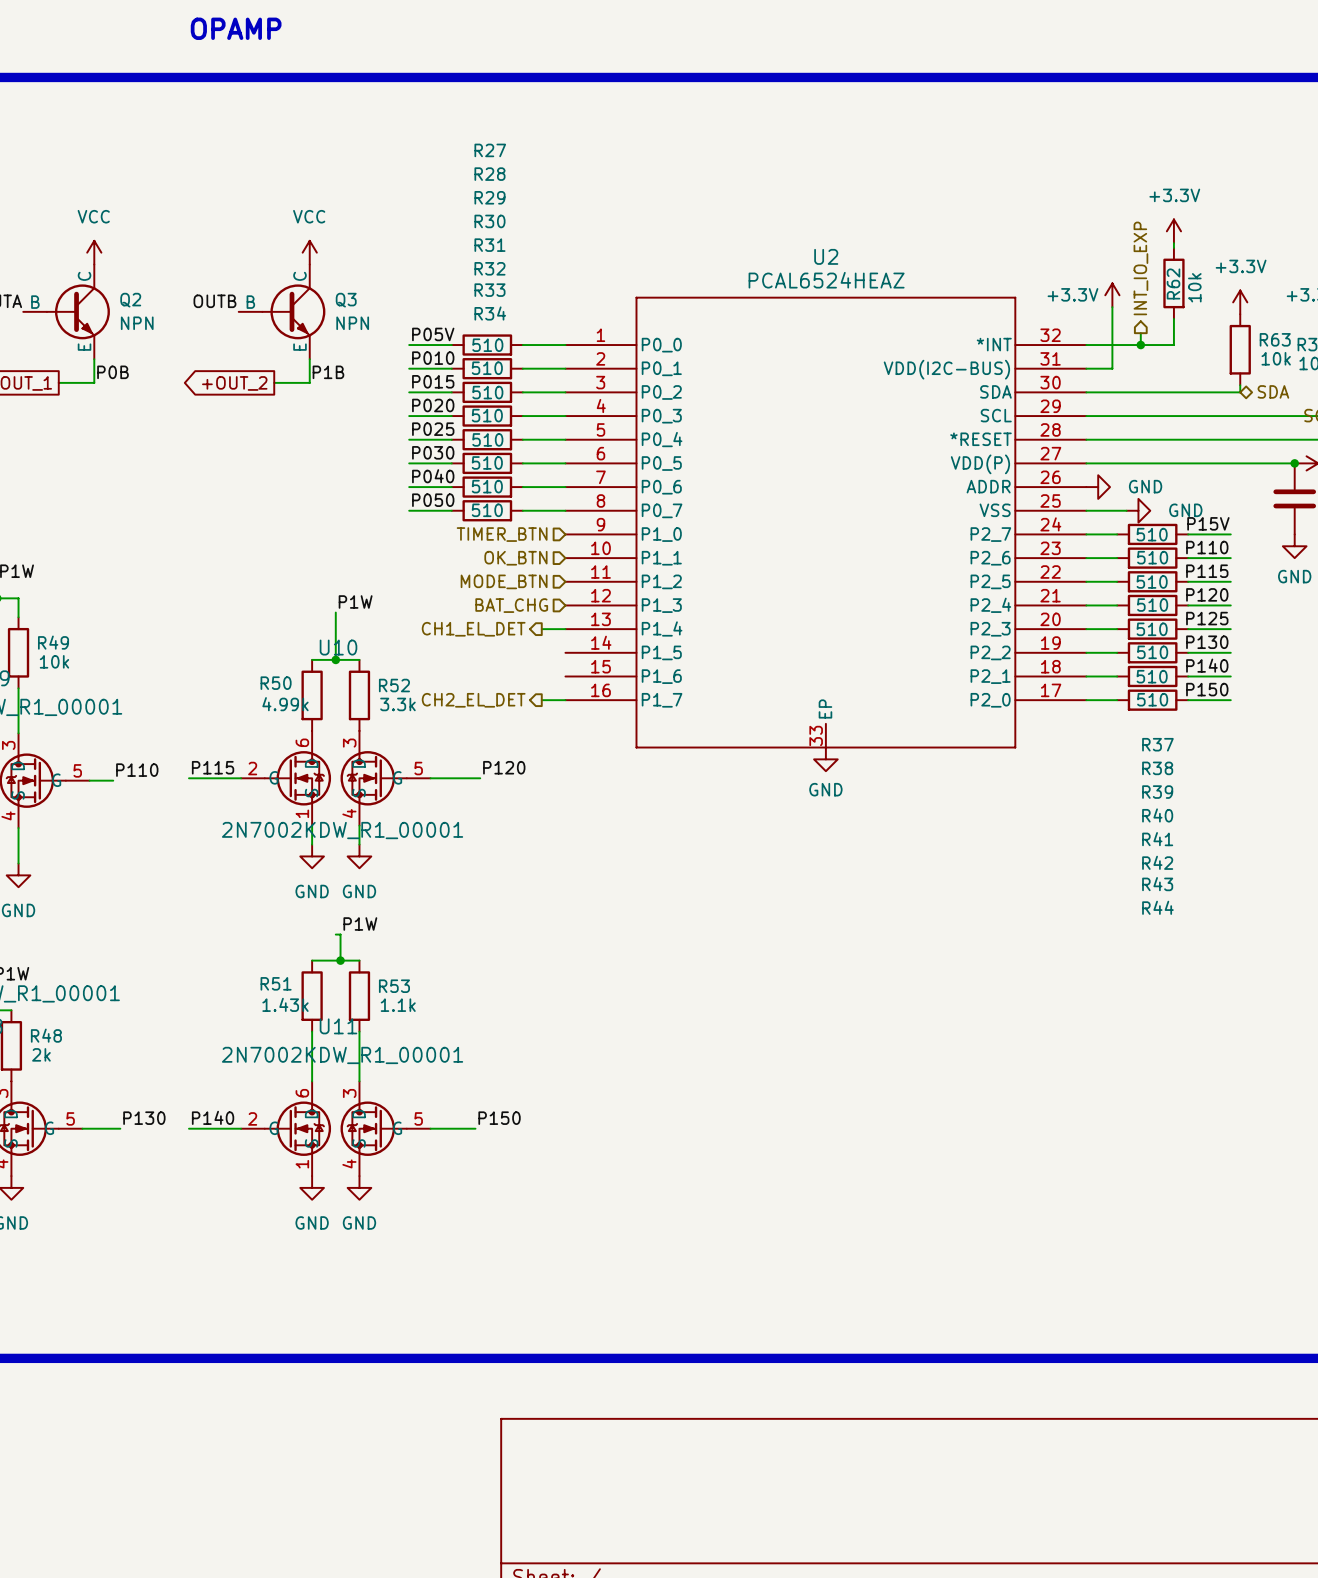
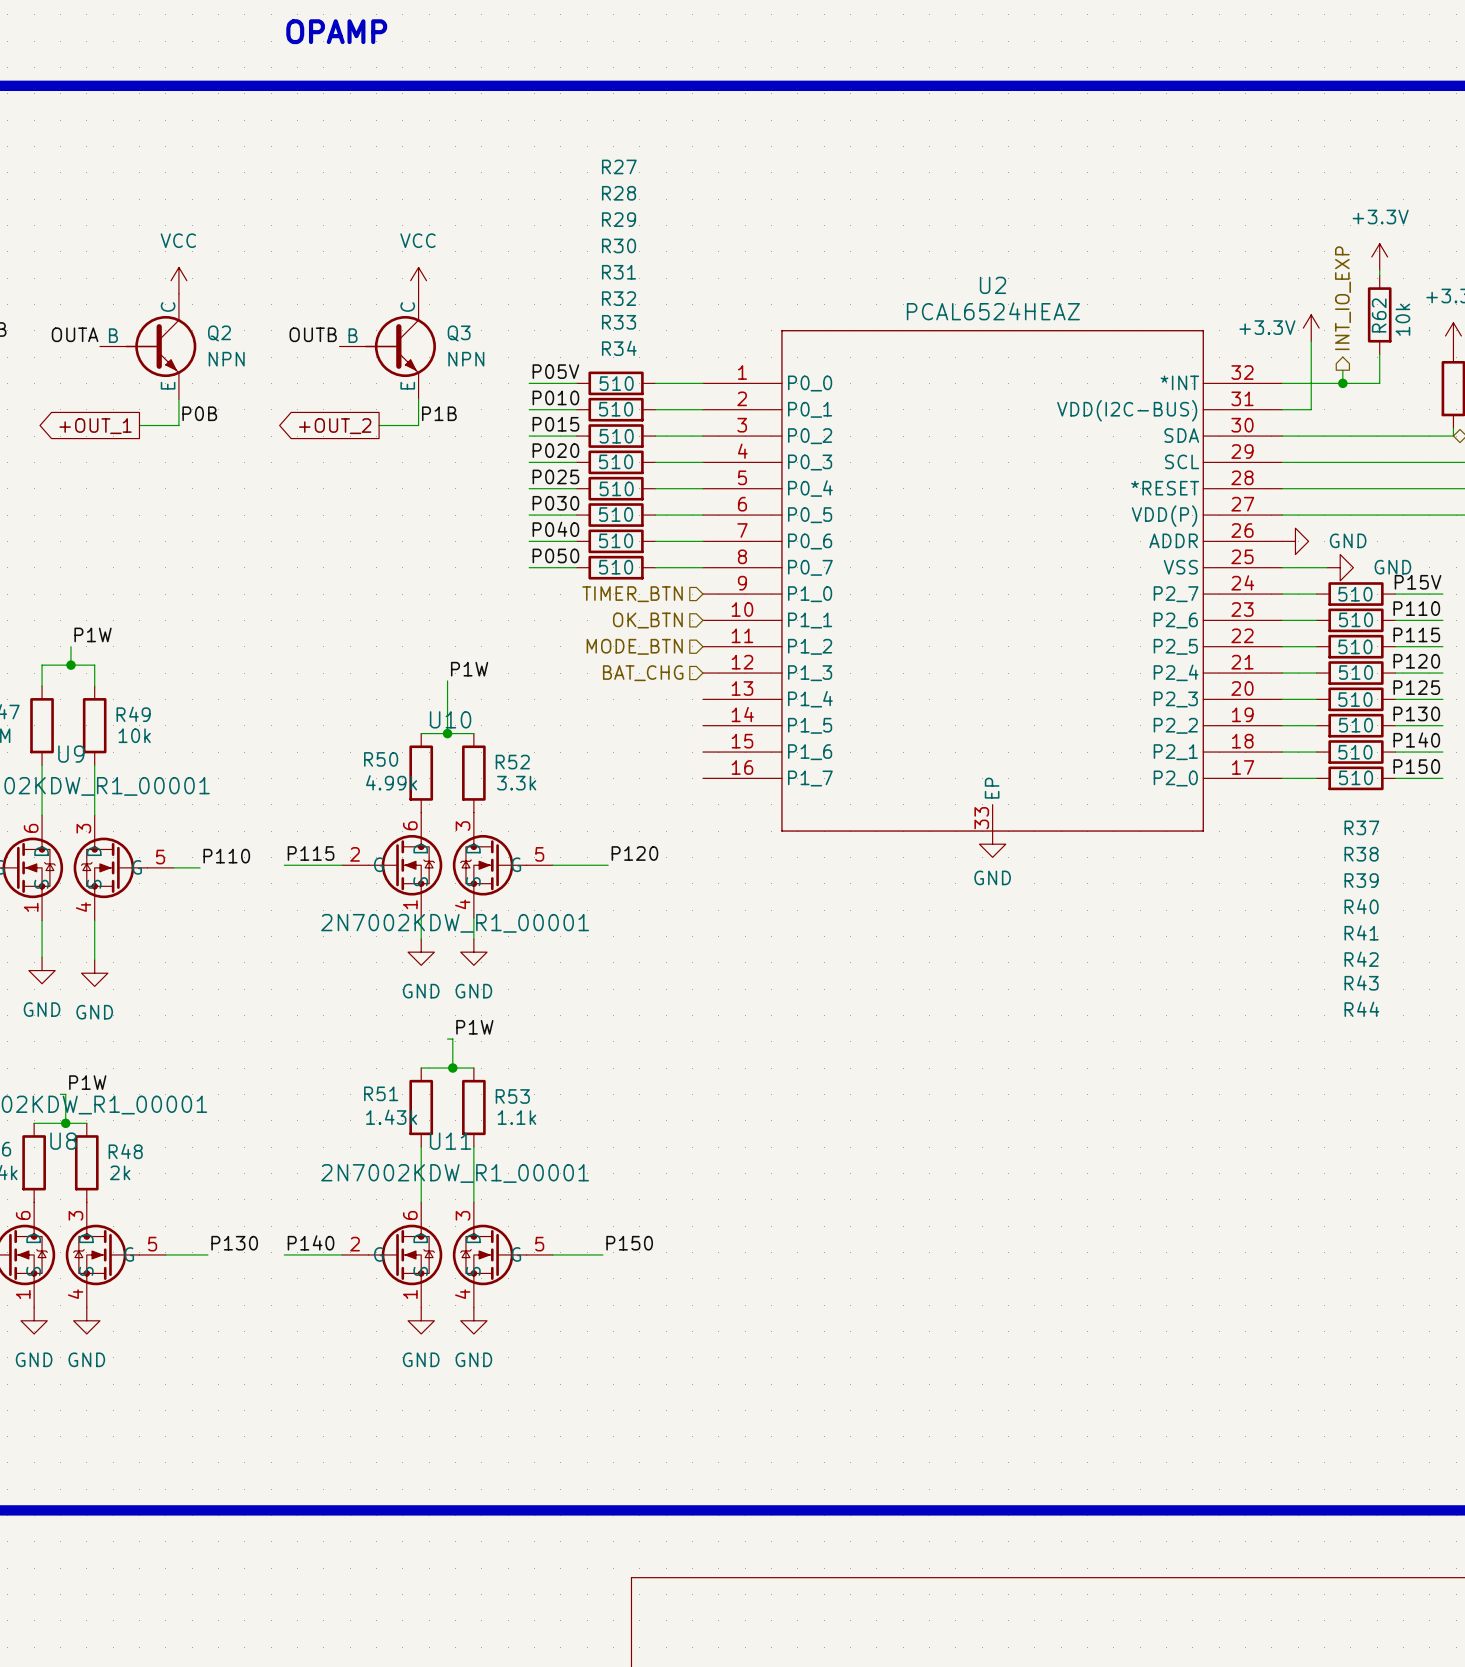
hierarchical label: CH1_EL_DET (473, 629) -> none
wire: (541, 629) (565, 629) -> none
hierarchical label: CH2_EL_DET (473, 700) -> none
wire: (541, 700) (565, 700) -> none

